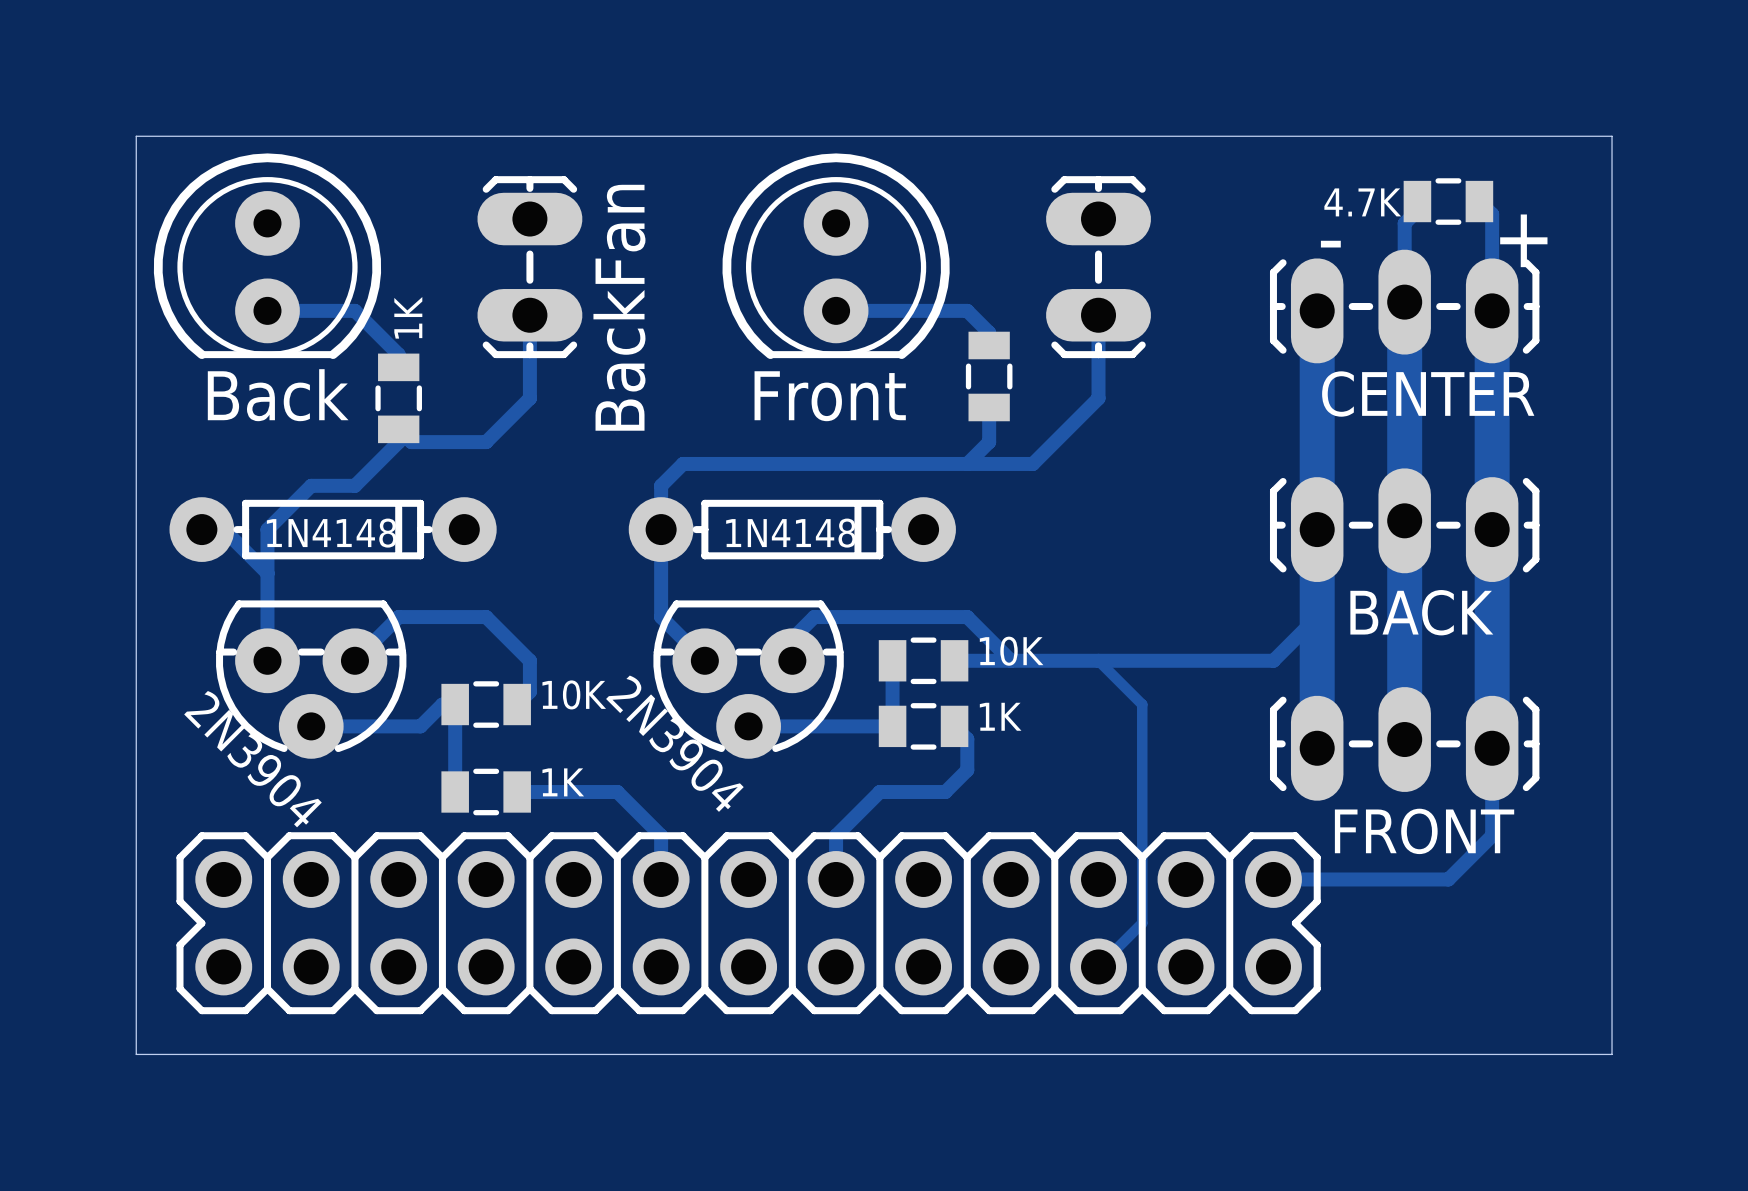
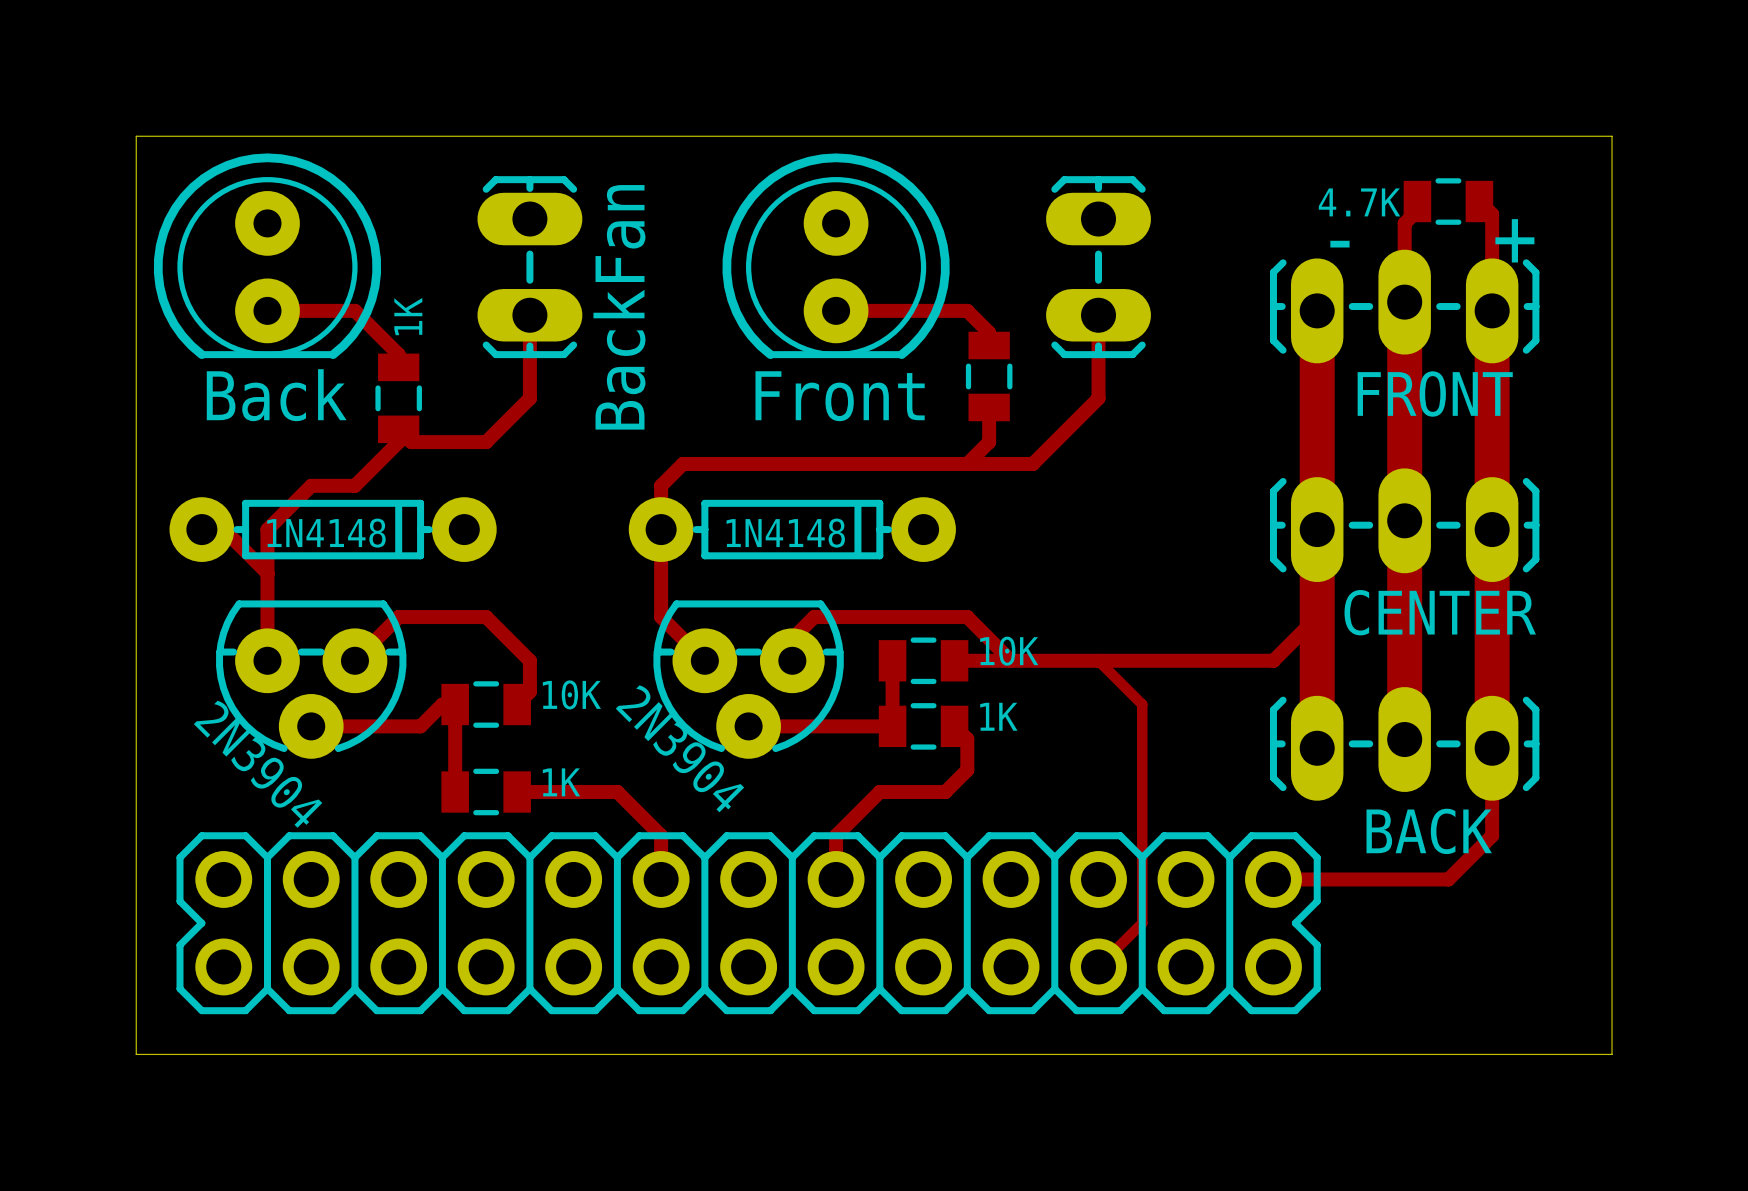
CENTER name position: CENTER (1428, 394) -> CENTER (1440, 612)
BACK name position: BACK (1421, 612) -> BACK (1429, 831)
FRONT name position: FRONT (1424, 831) -> FRONT (1435, 394)

